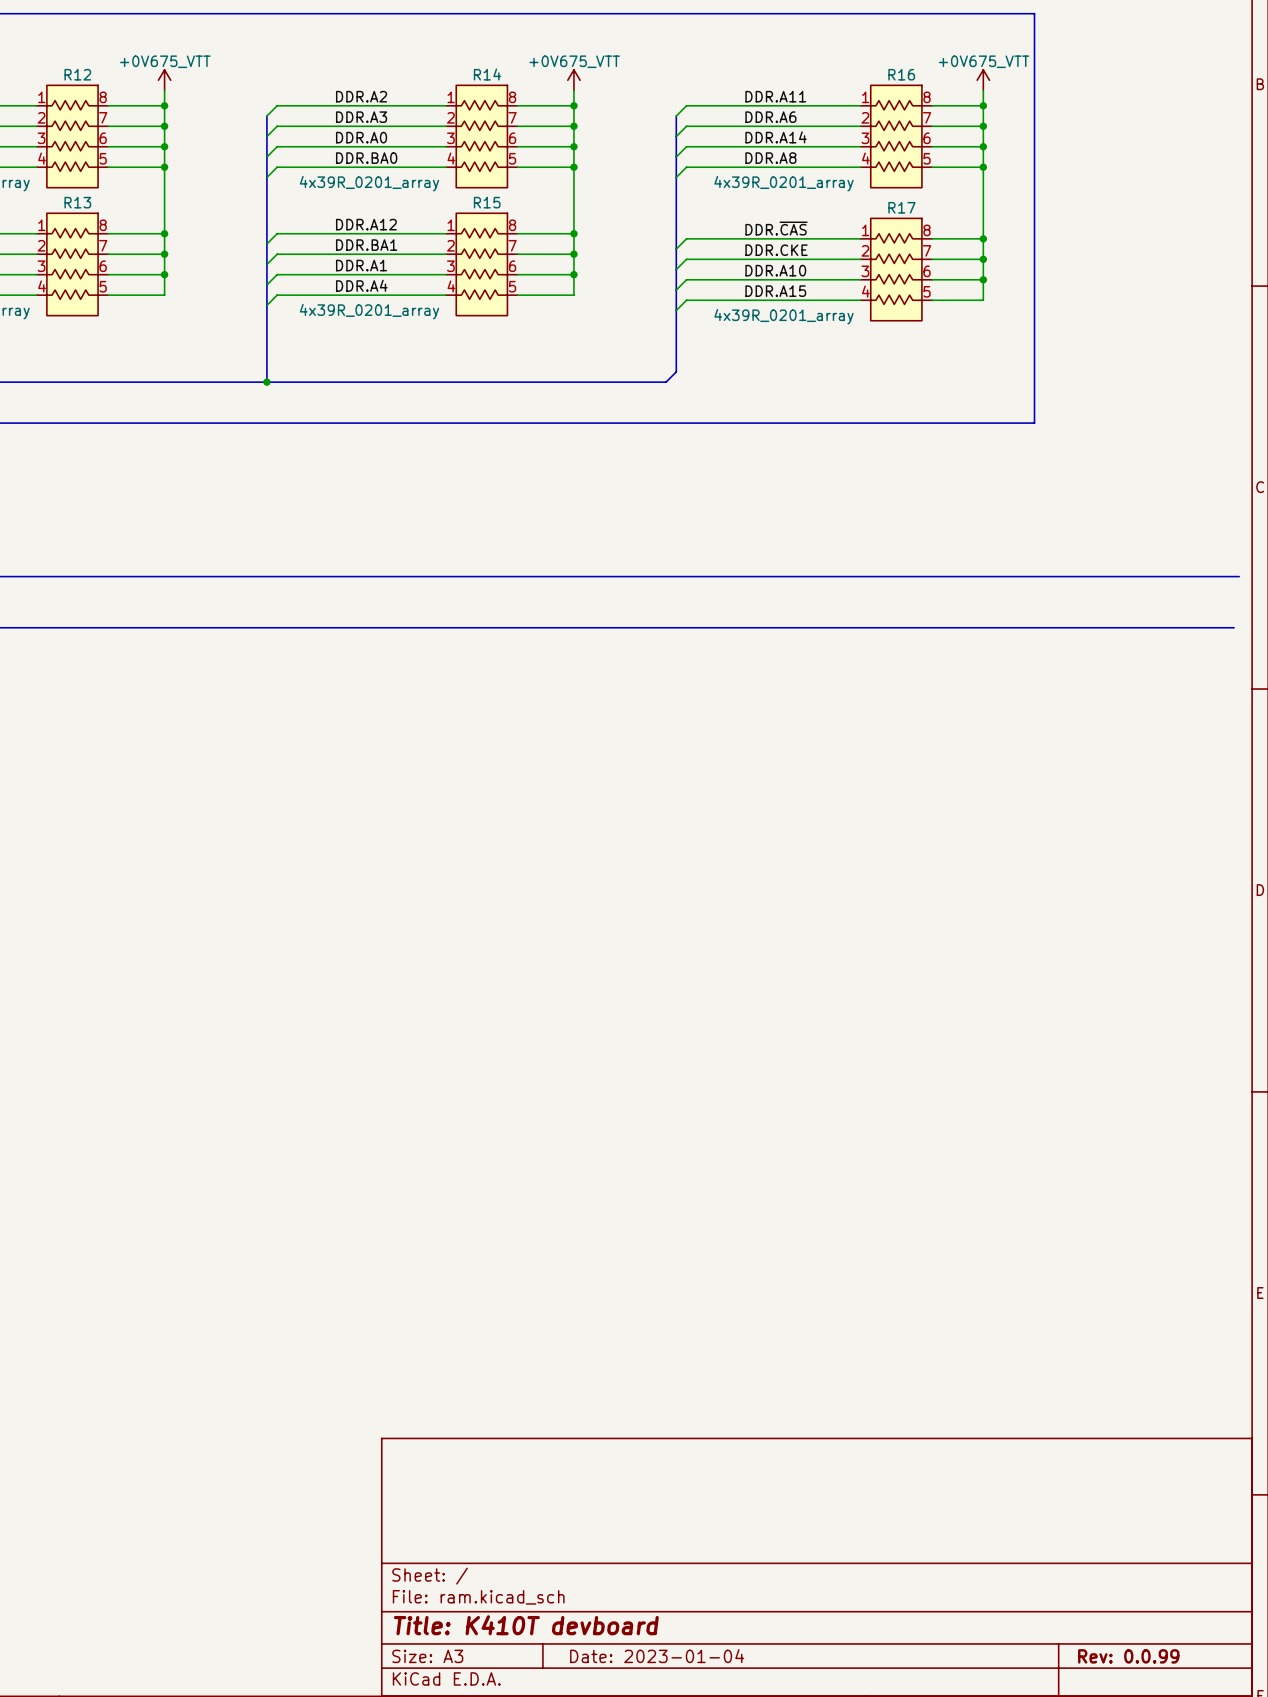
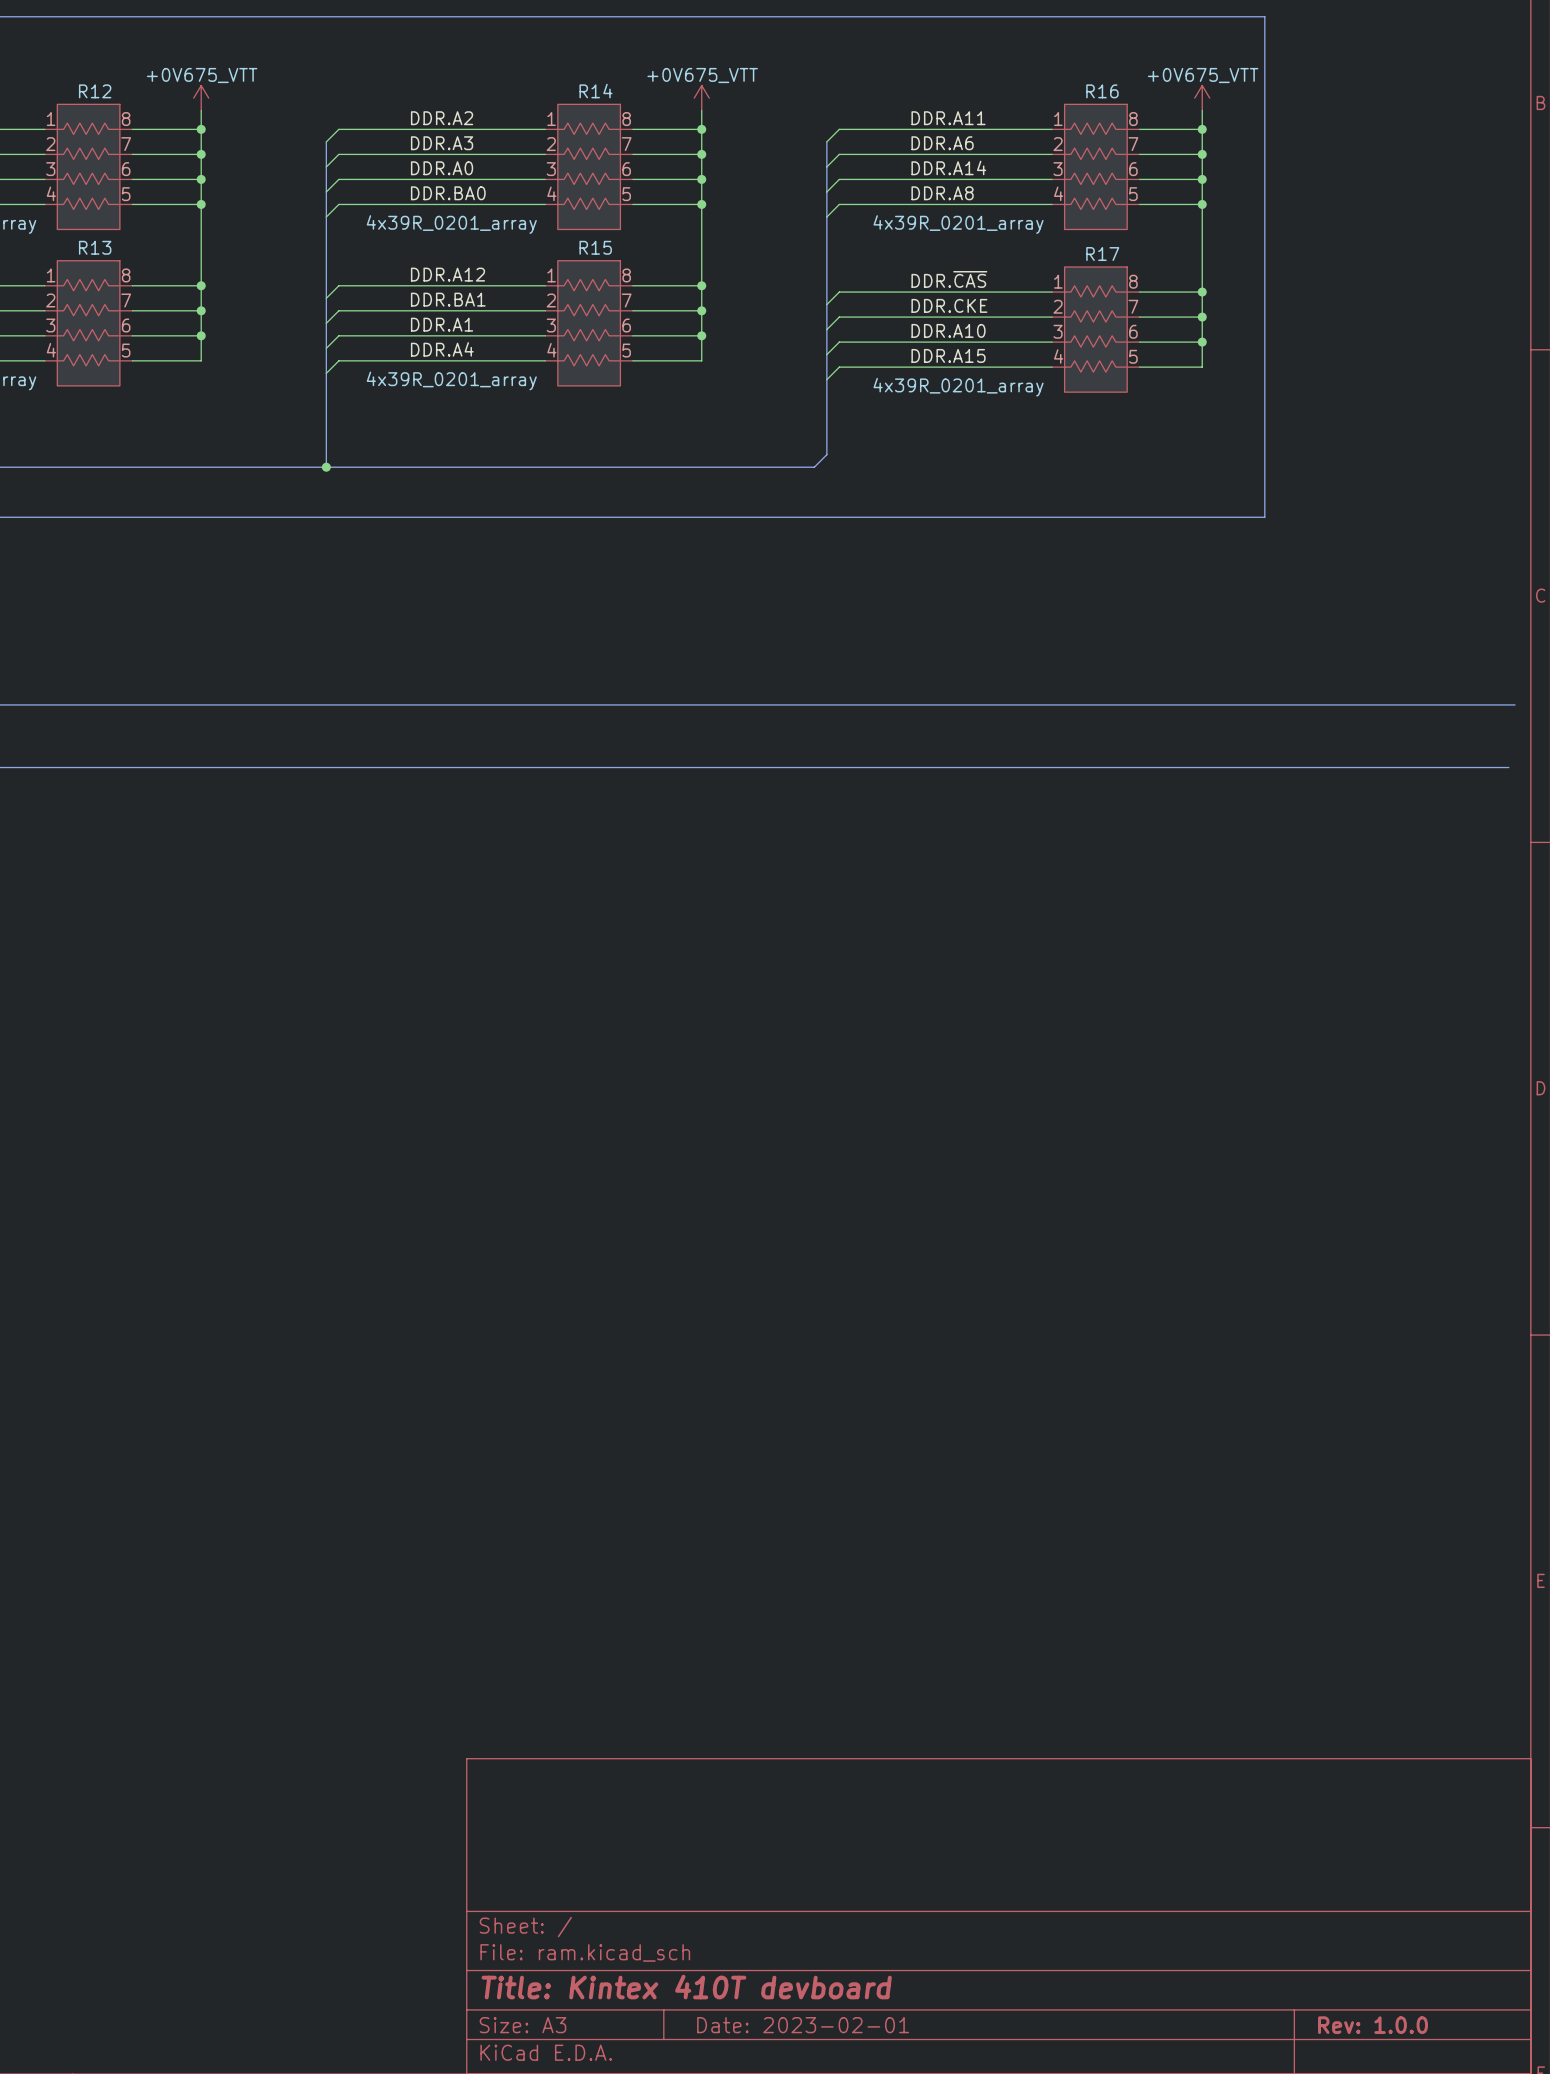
title block: Title: K410T devboard (526, 1625) -> Title: Kintex 410T devboard (686, 1987)
title block: Date: 2023-01-04 (657, 1656) -> Date: 2023-02-01 (803, 2025)
title block: Rev: 0.0.99 (1128, 1656) -> Rev: 1.0.0 (1373, 2025)

